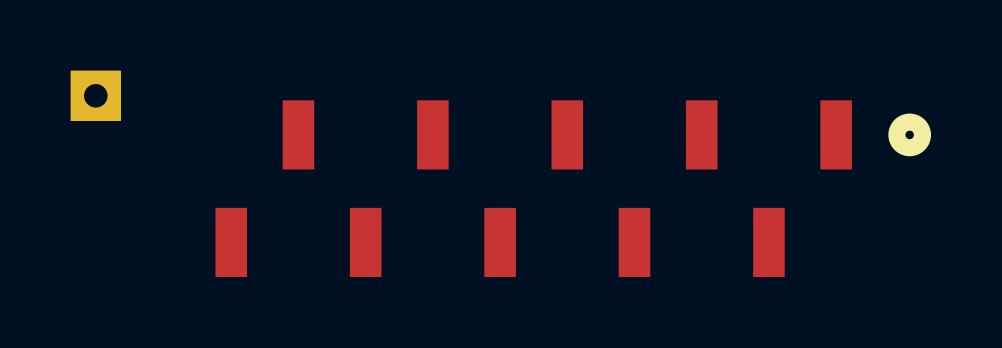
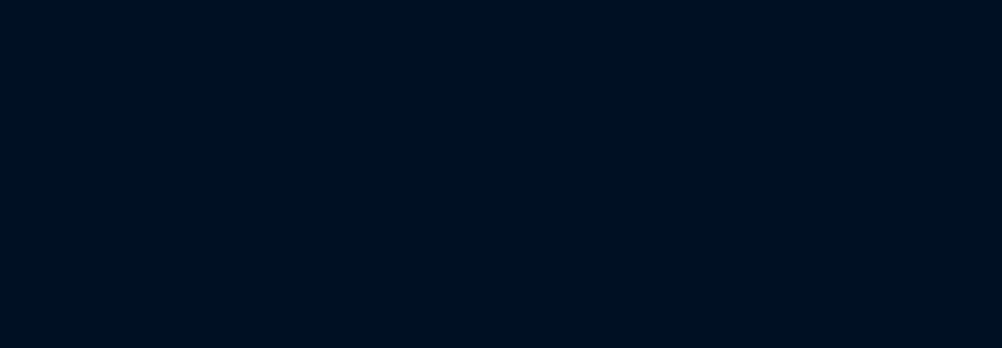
part: (95, 95) -> none
part: (573, 188) -> none

